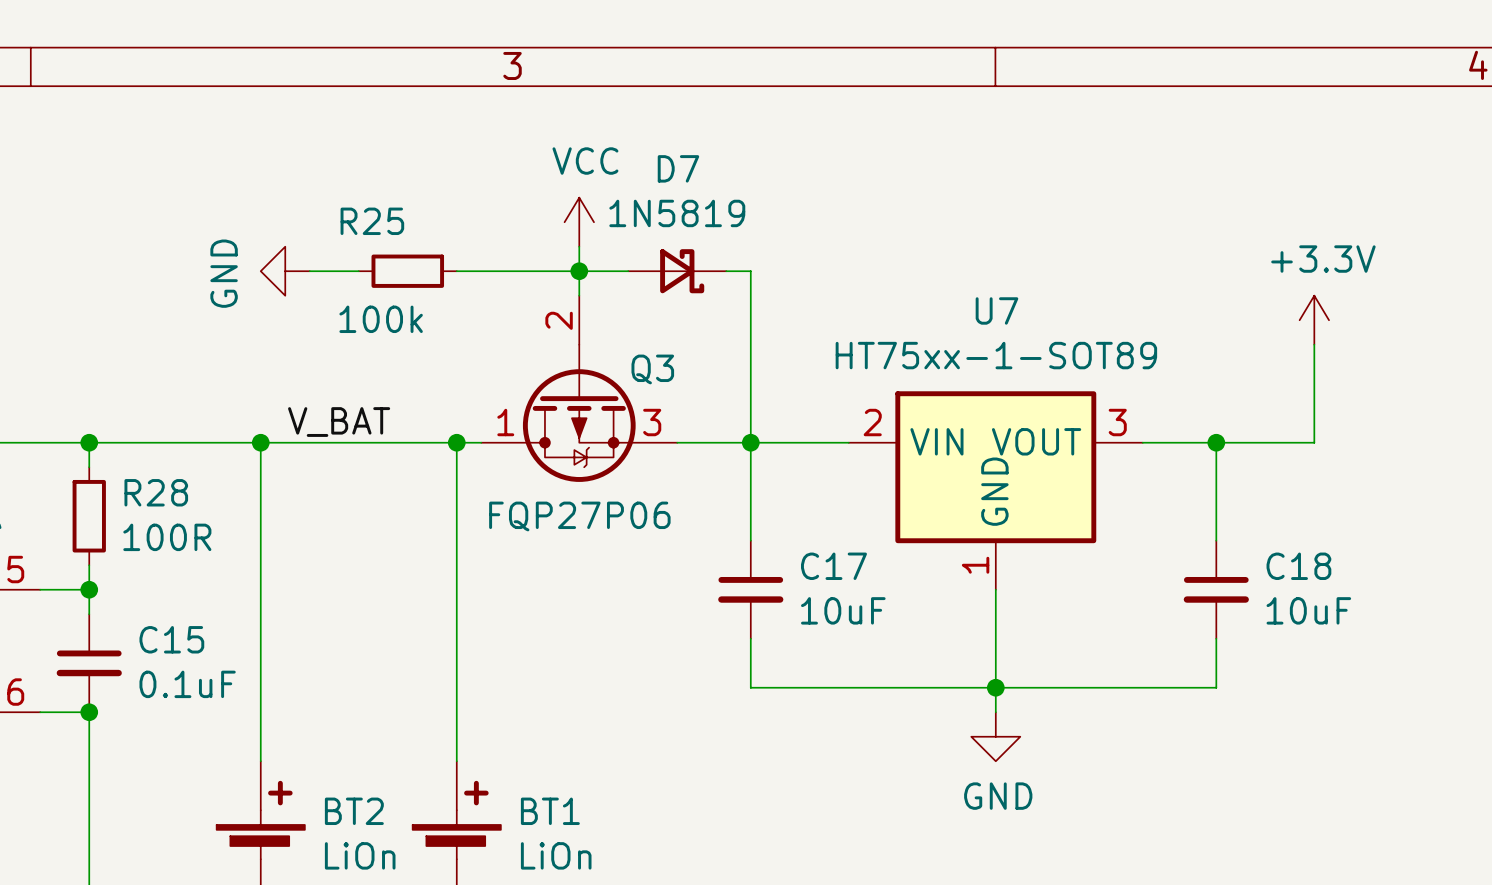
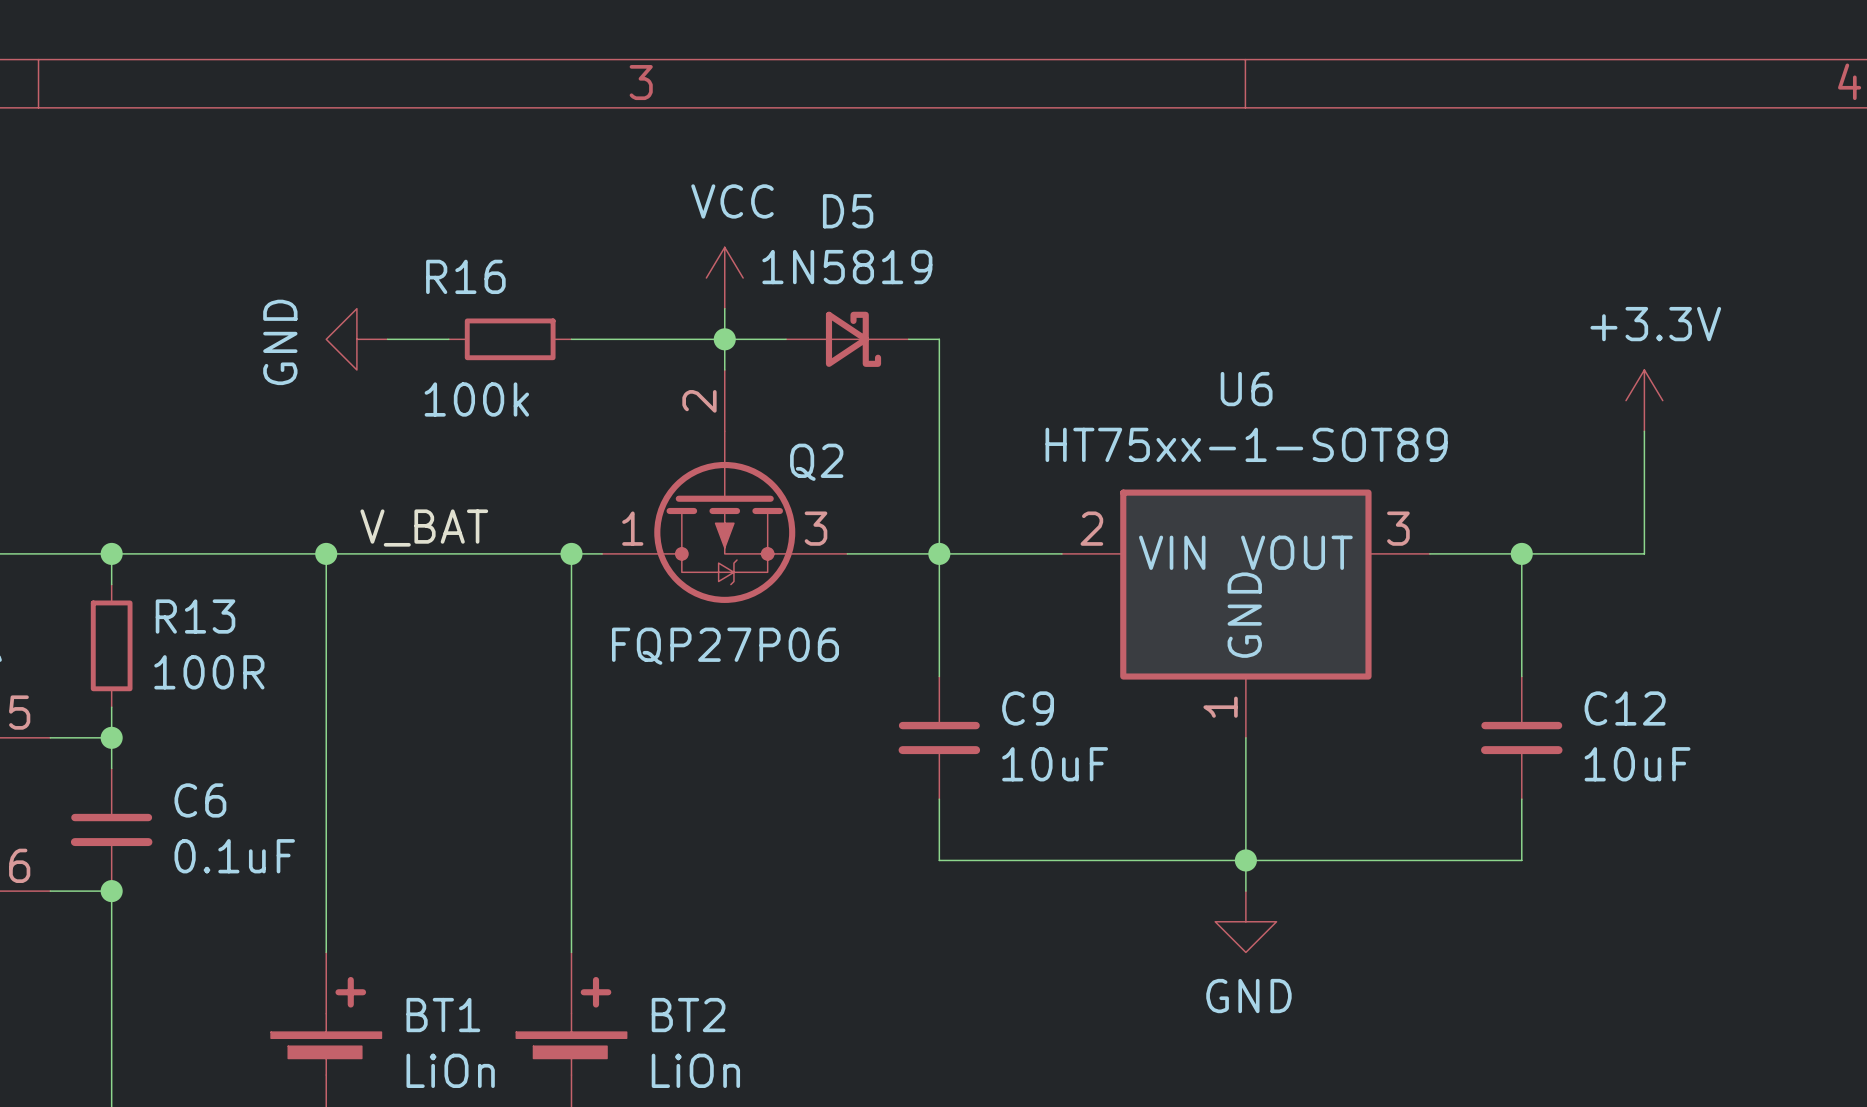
D7 name: D7 (678, 168) -> D5 (848, 211)
R25 name: R25 (372, 221) -> R16 (465, 276)
U7 name: U7 (996, 310) -> U6 (1246, 389)
Q3 name: Q3 (652, 369) -> Q2 (816, 462)
R28 name: R28 (156, 492) -> R13 (195, 616)
C17 name: C17 (833, 566) -> C9 (1028, 708)
C18 name: C18 (1298, 566) -> C12 (1625, 708)
C15 name: C15 (171, 639) -> C6 (200, 800)
BT2 name: BT2 (354, 811) -> BT1 (443, 1015)
BT1 name: BT1 (550, 811) -> BT2 (688, 1015)

